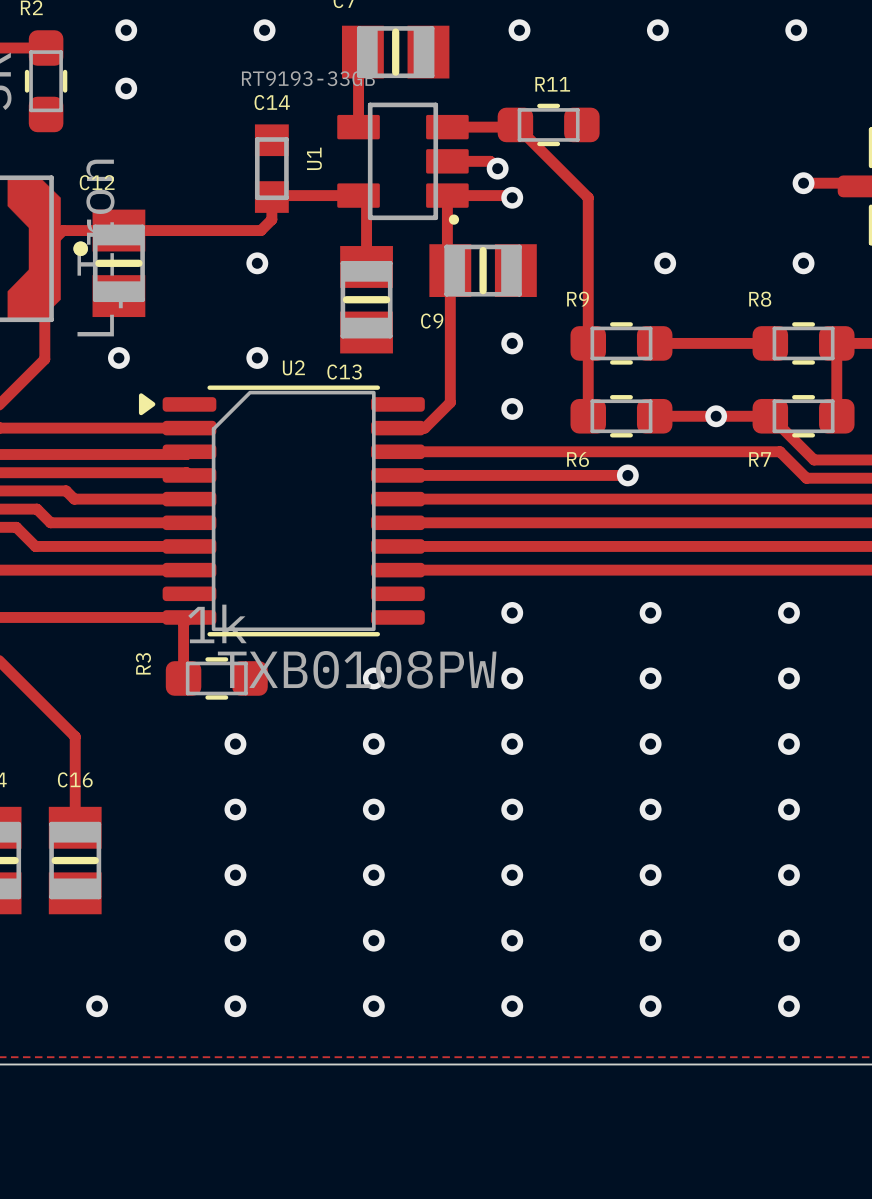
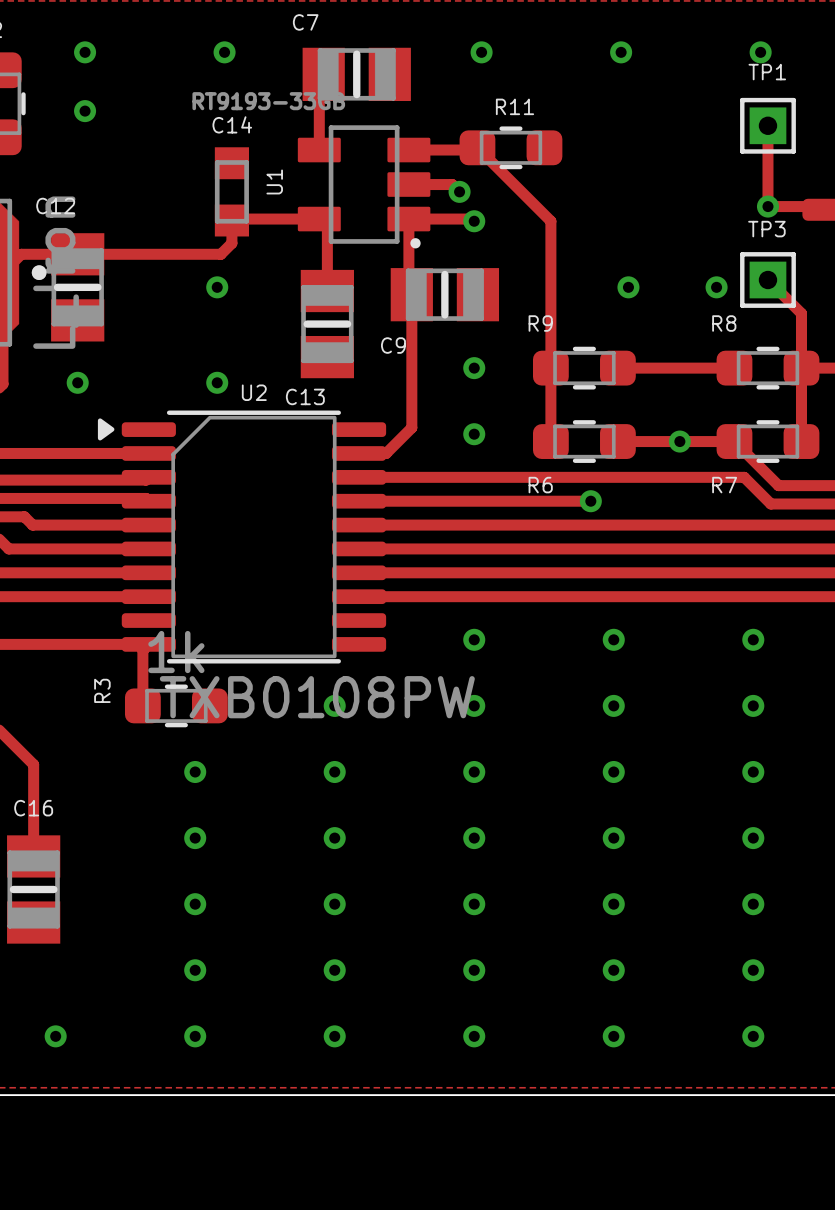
track: none -> (767, 125) (767, 206)
TP1: none -> (767, 125)
track: none -> (767, 279) (801, 313) (801, 368)
TP3: none -> (767, 279)
via position: (803, 263) -> (716, 287)

